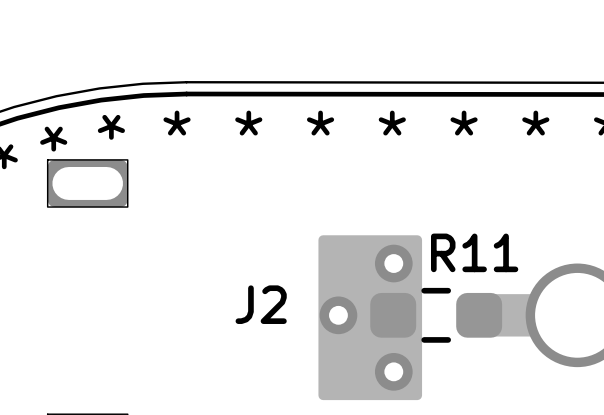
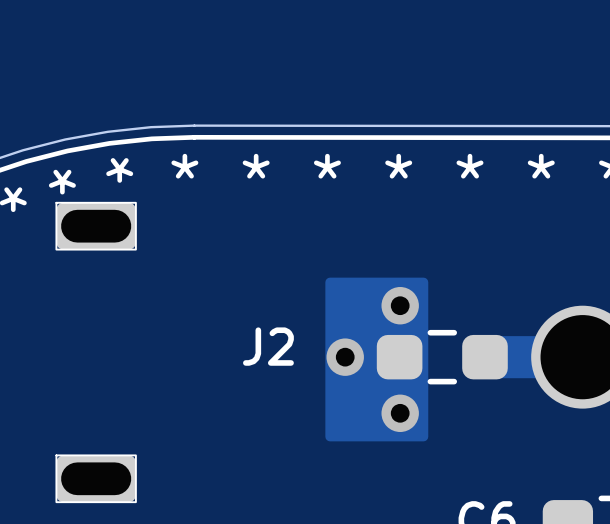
R11 name: R11 (474, 252) -> none

